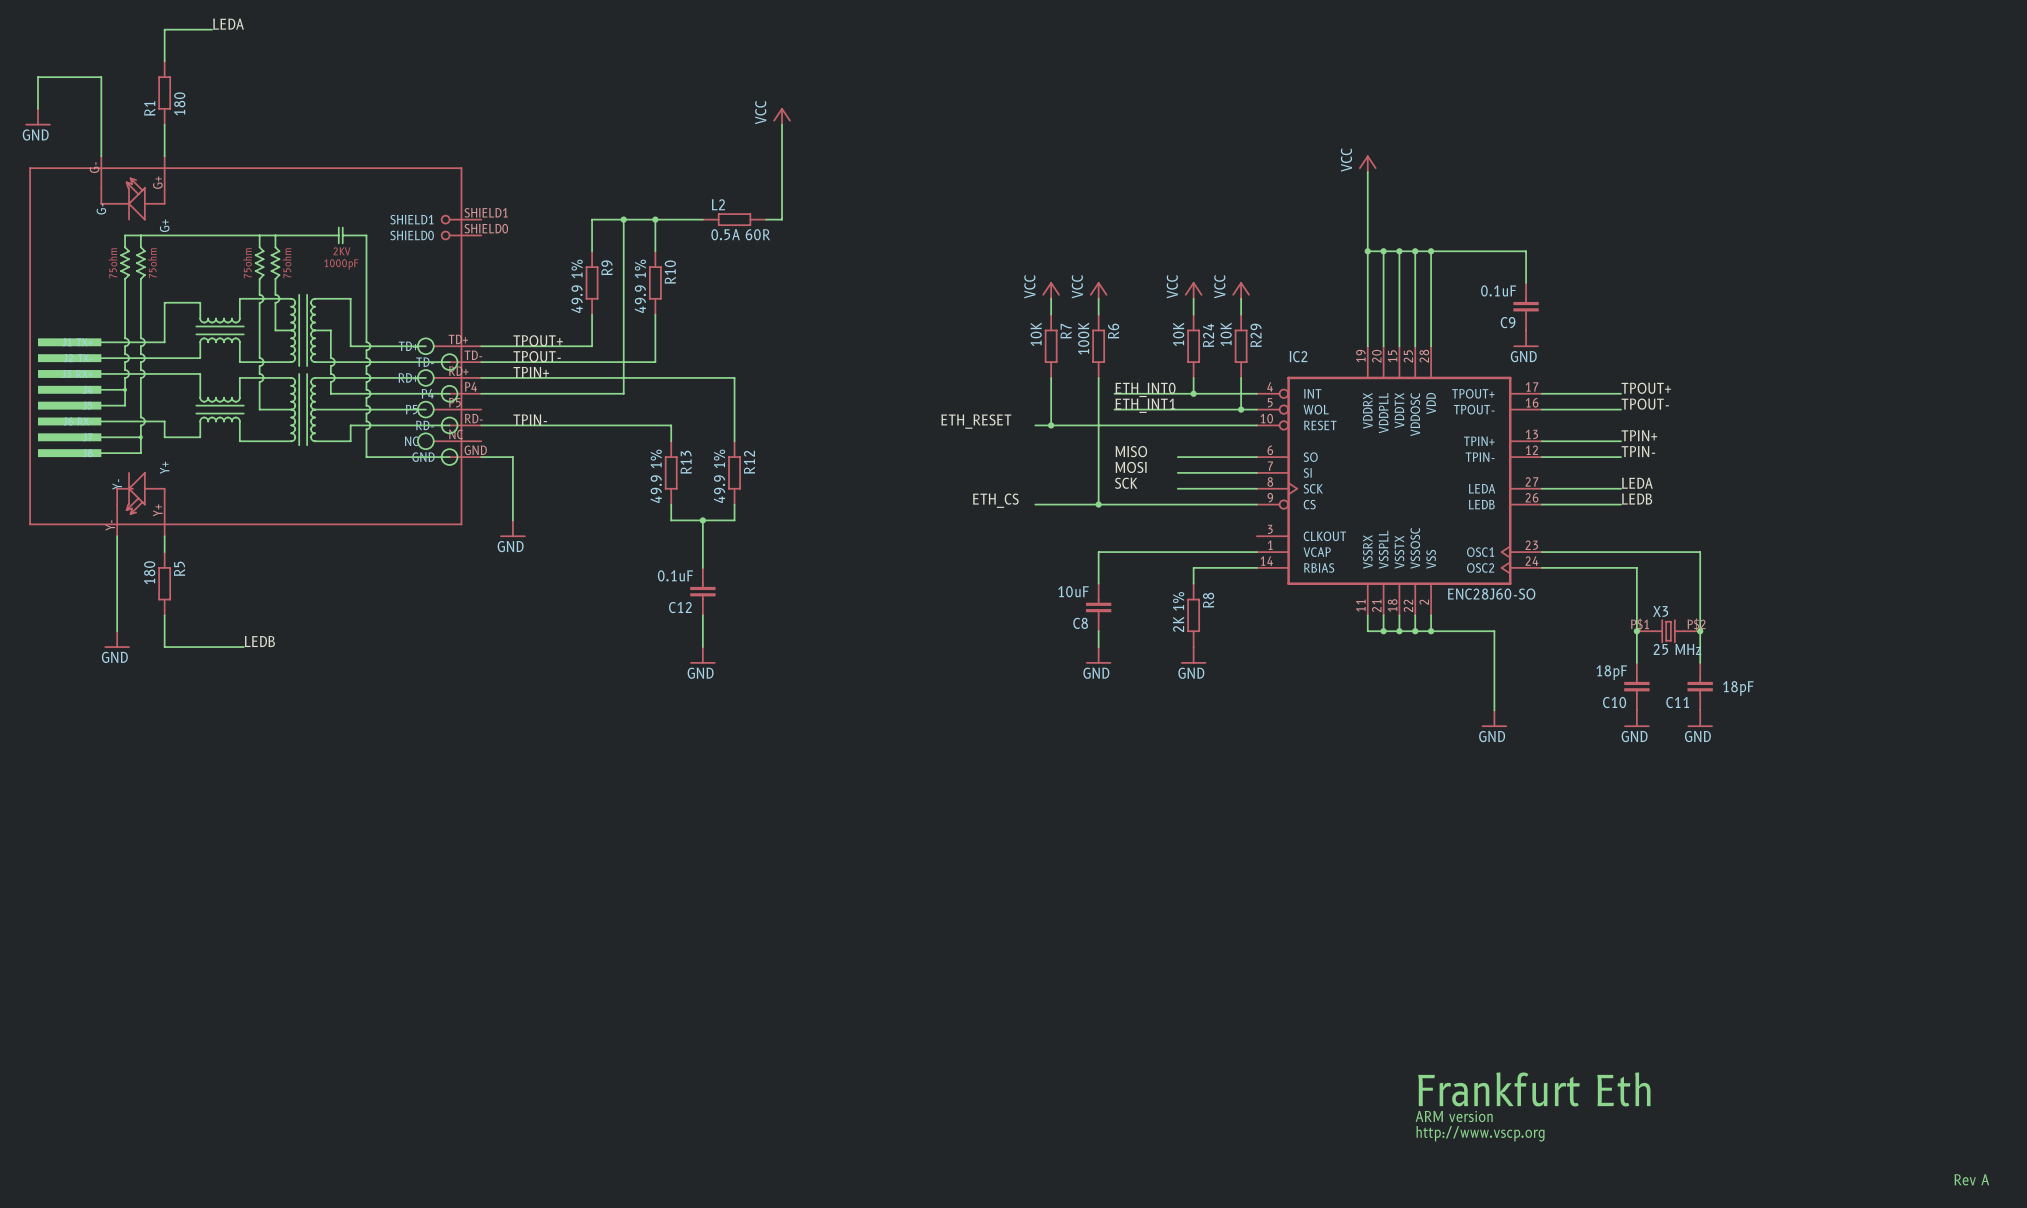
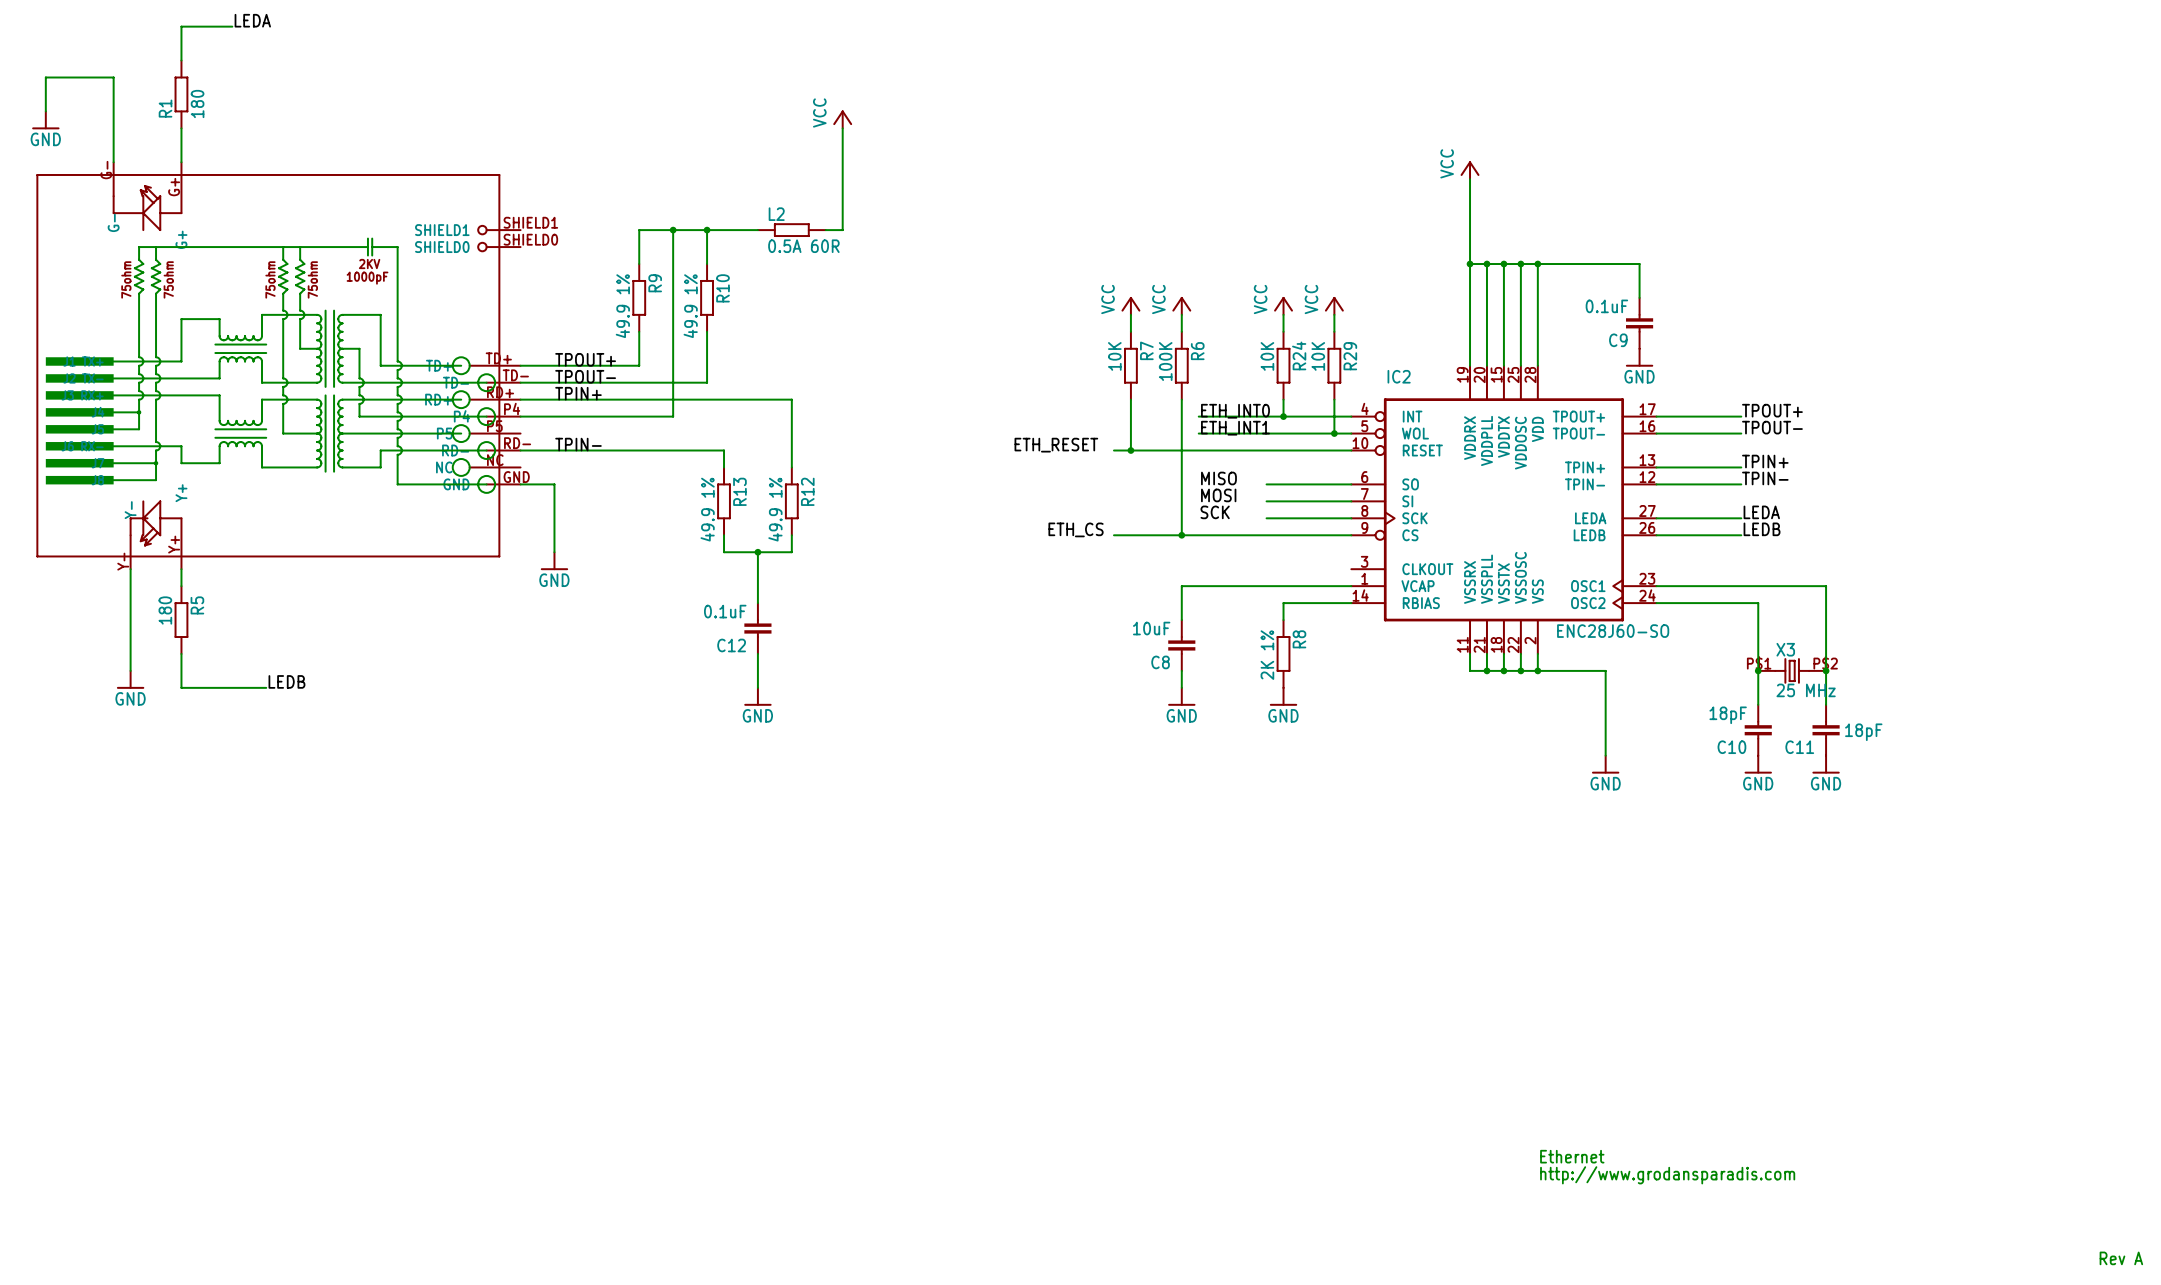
text: none -> Ethernet (1572, 1156)
text: Frankfurt Eth (1534, 1089) -> none
text: none -> http://www.grodansparadis.com (1667, 1175)
text: ARM version (1454, 1116) -> none
text: http://www.vscp.org (1480, 1133) -> none

